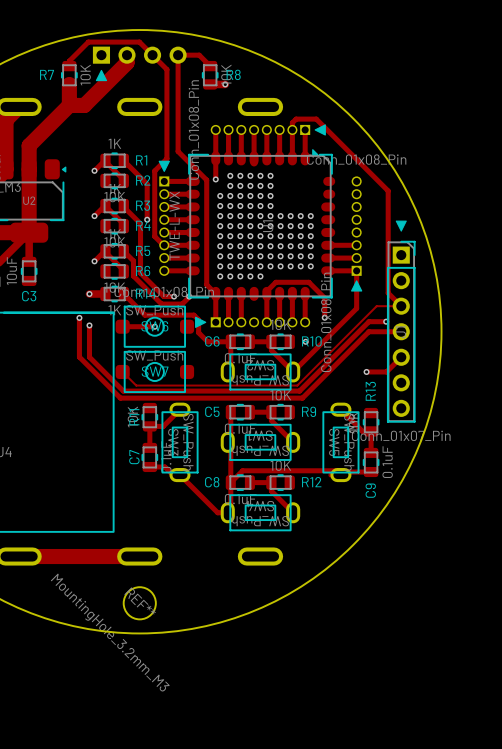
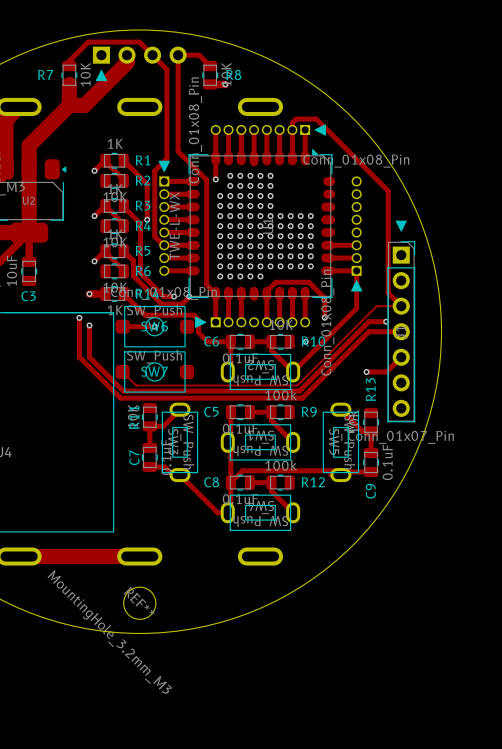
R9 value: 10K (280, 395) -> 100k (281, 394)
R12 value: 10K (280, 465) -> 100k (281, 465)

